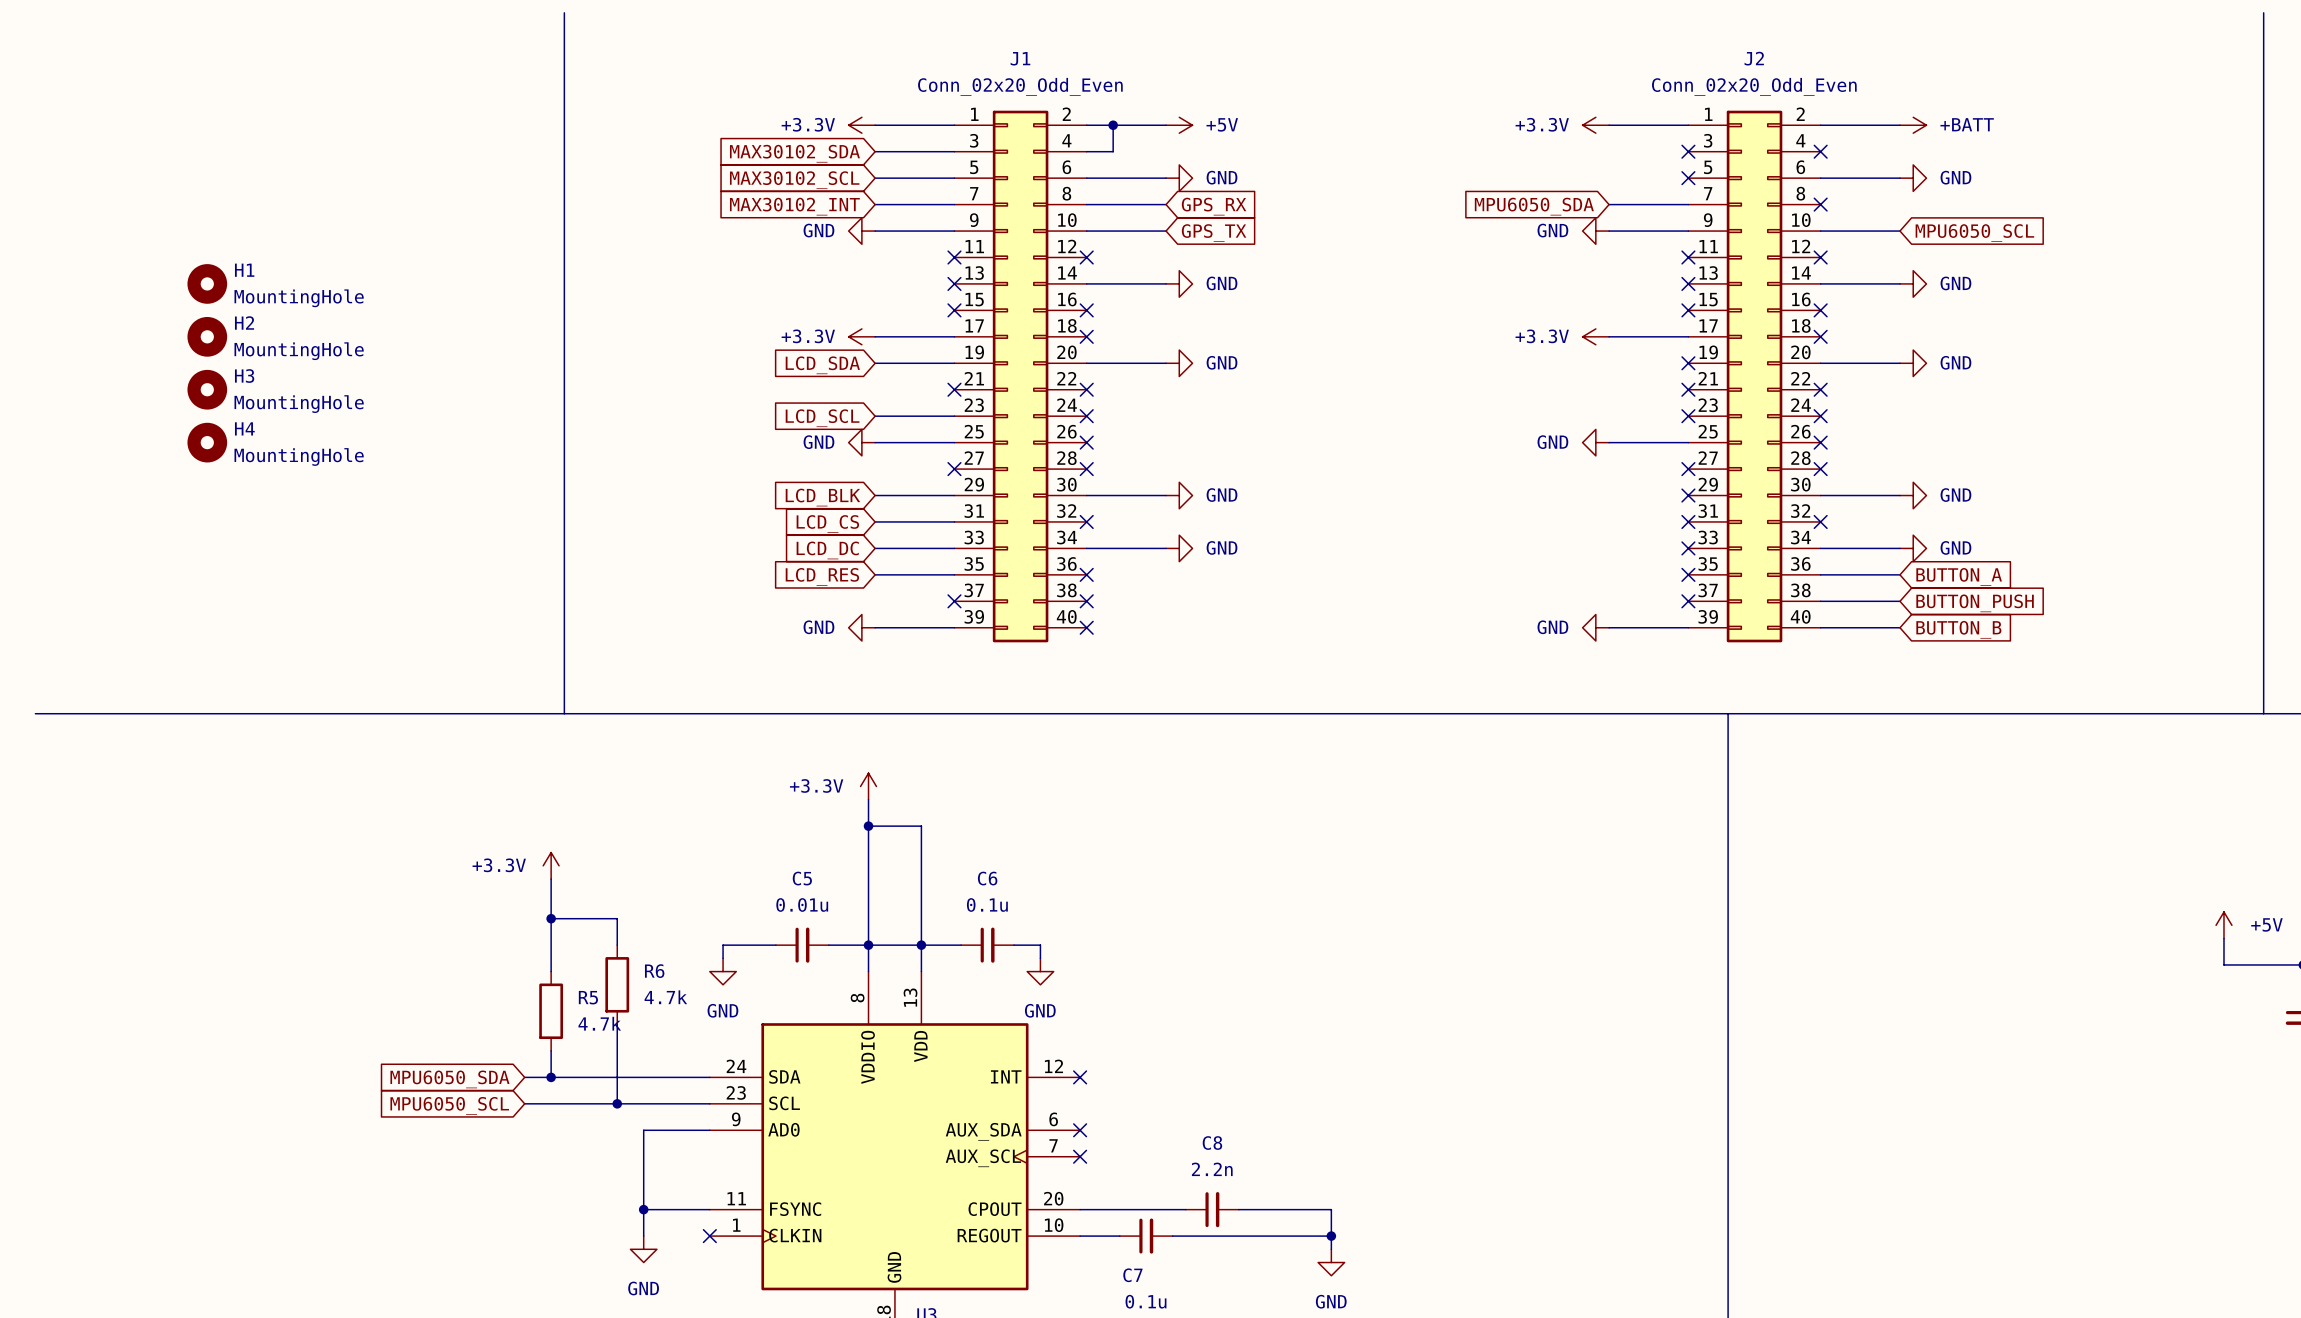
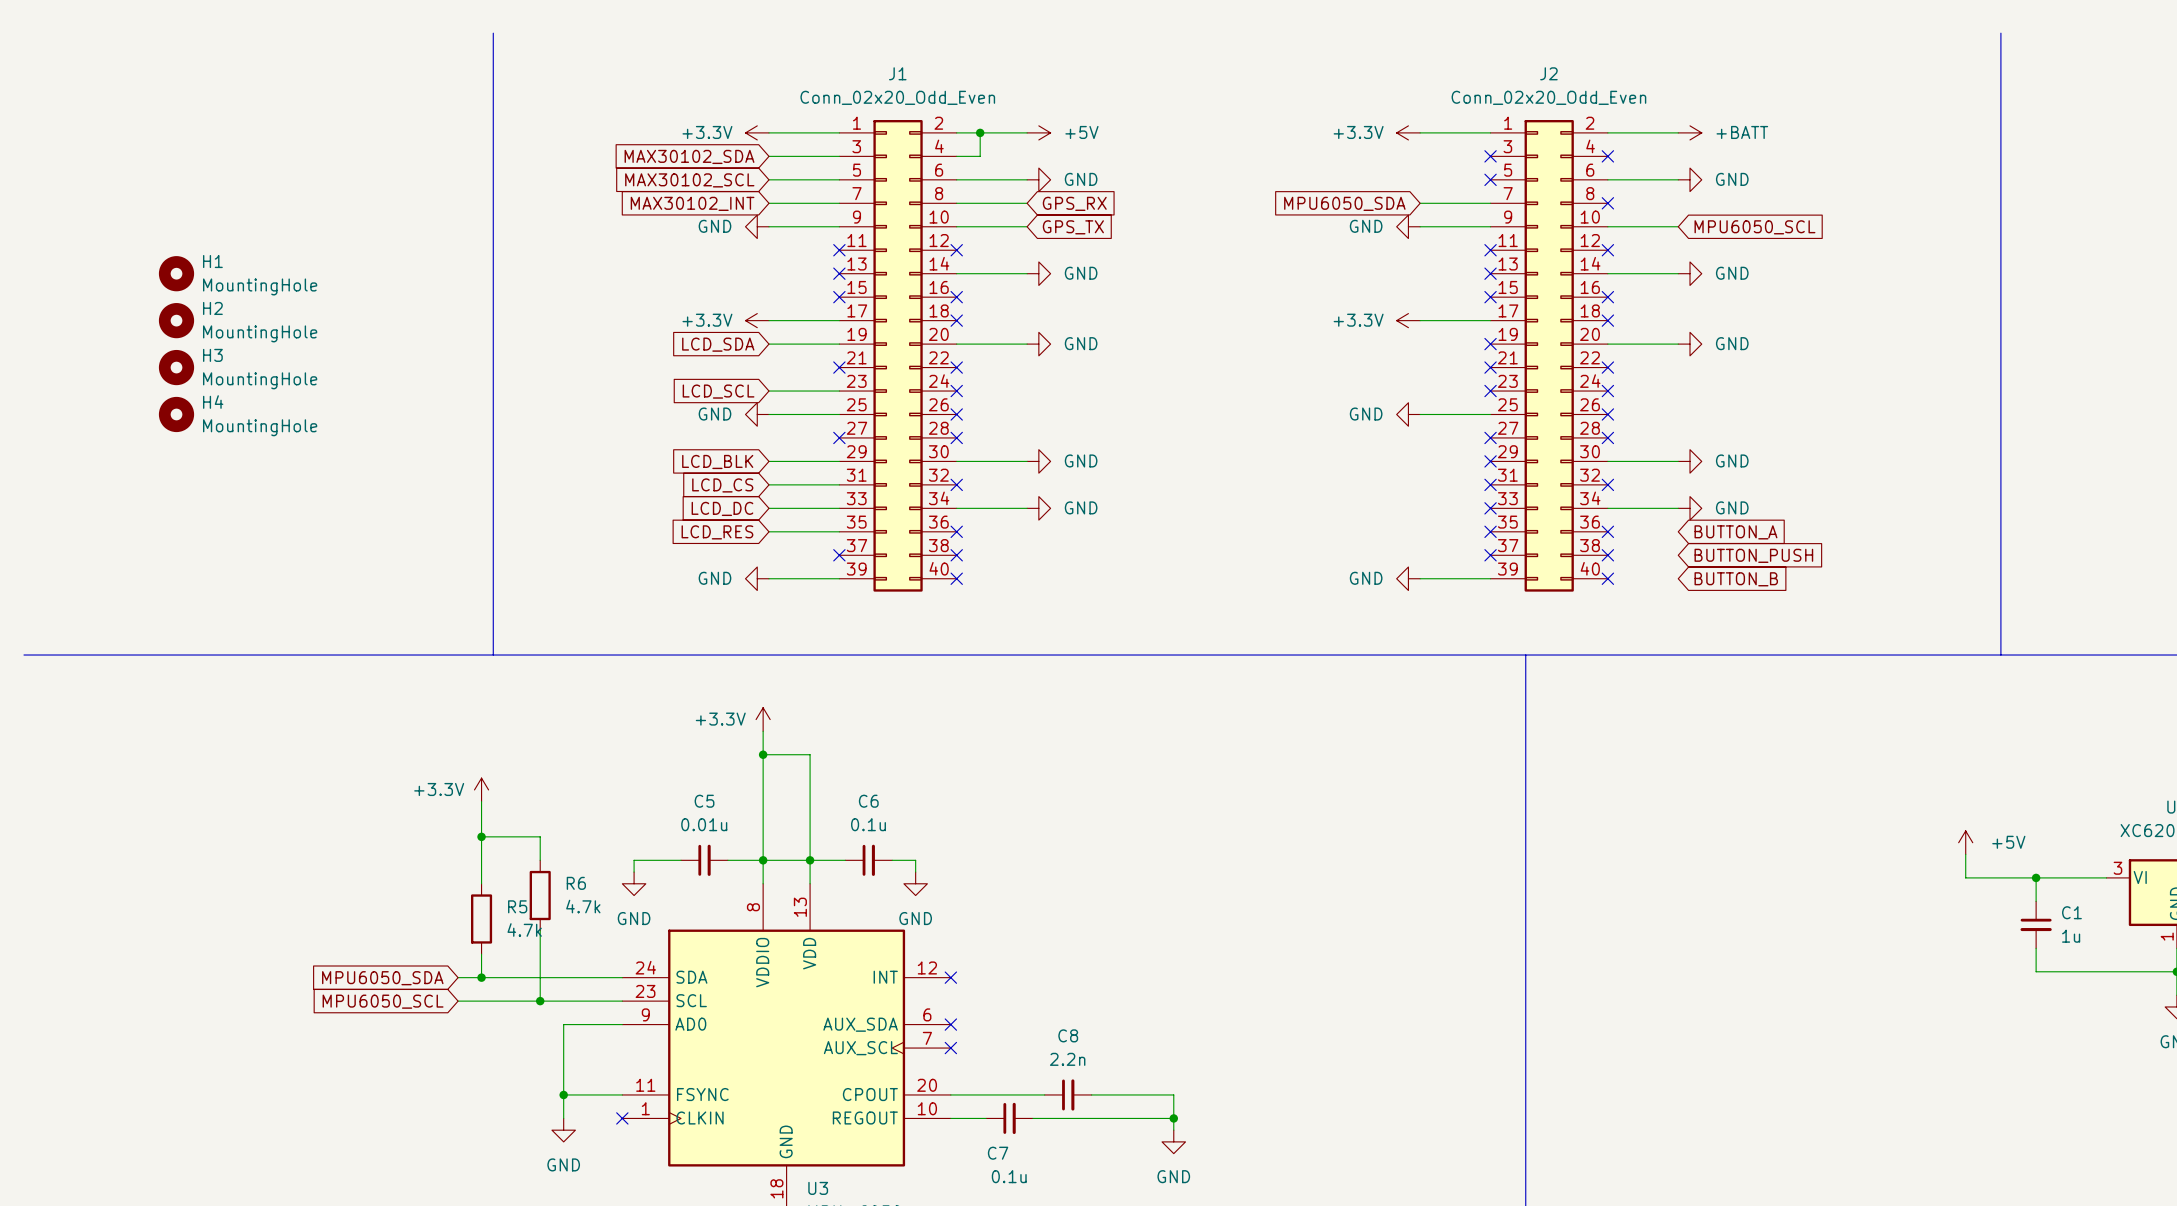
wire: (1820, 574) (1900, 574) -> none
no-connect mark: none -> (1607, 531)
wire: (1820, 601) (1900, 601) -> none
no-connect mark: none -> (1607, 555)
wire: (1820, 627) (1900, 627) -> none
no-connect mark: none -> (1607, 578)

